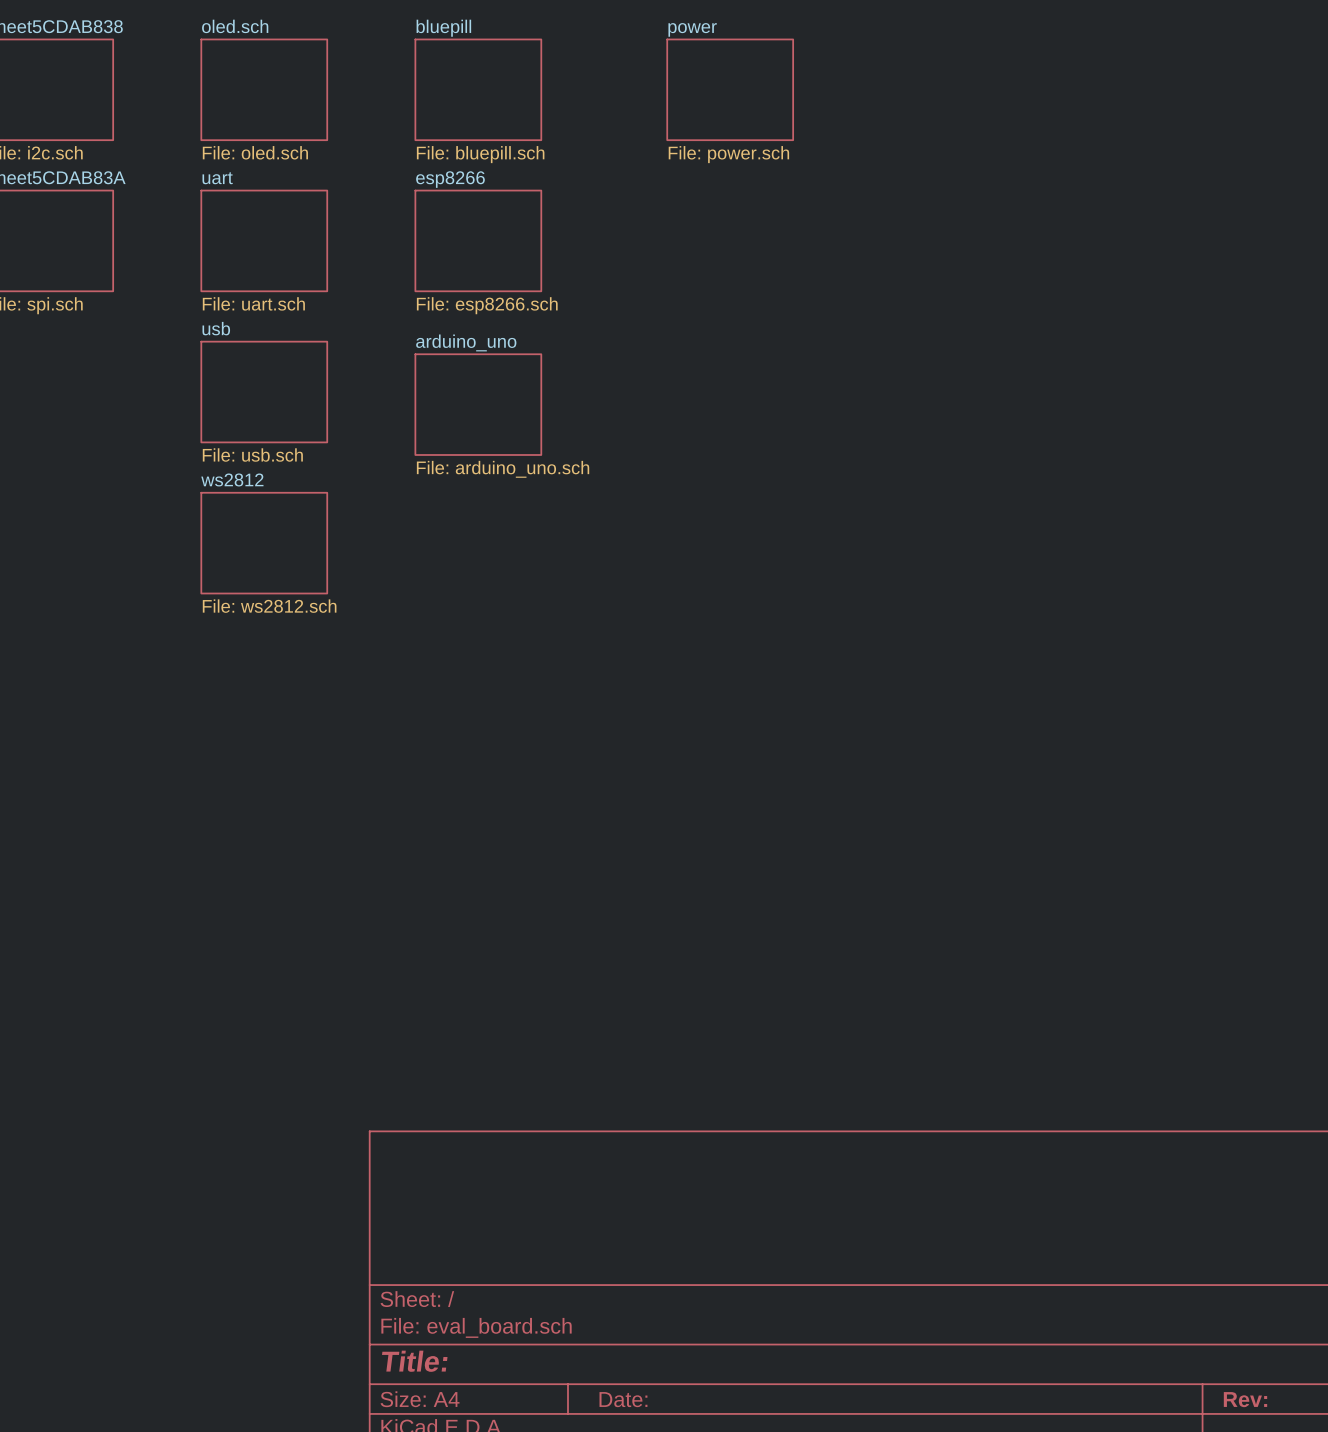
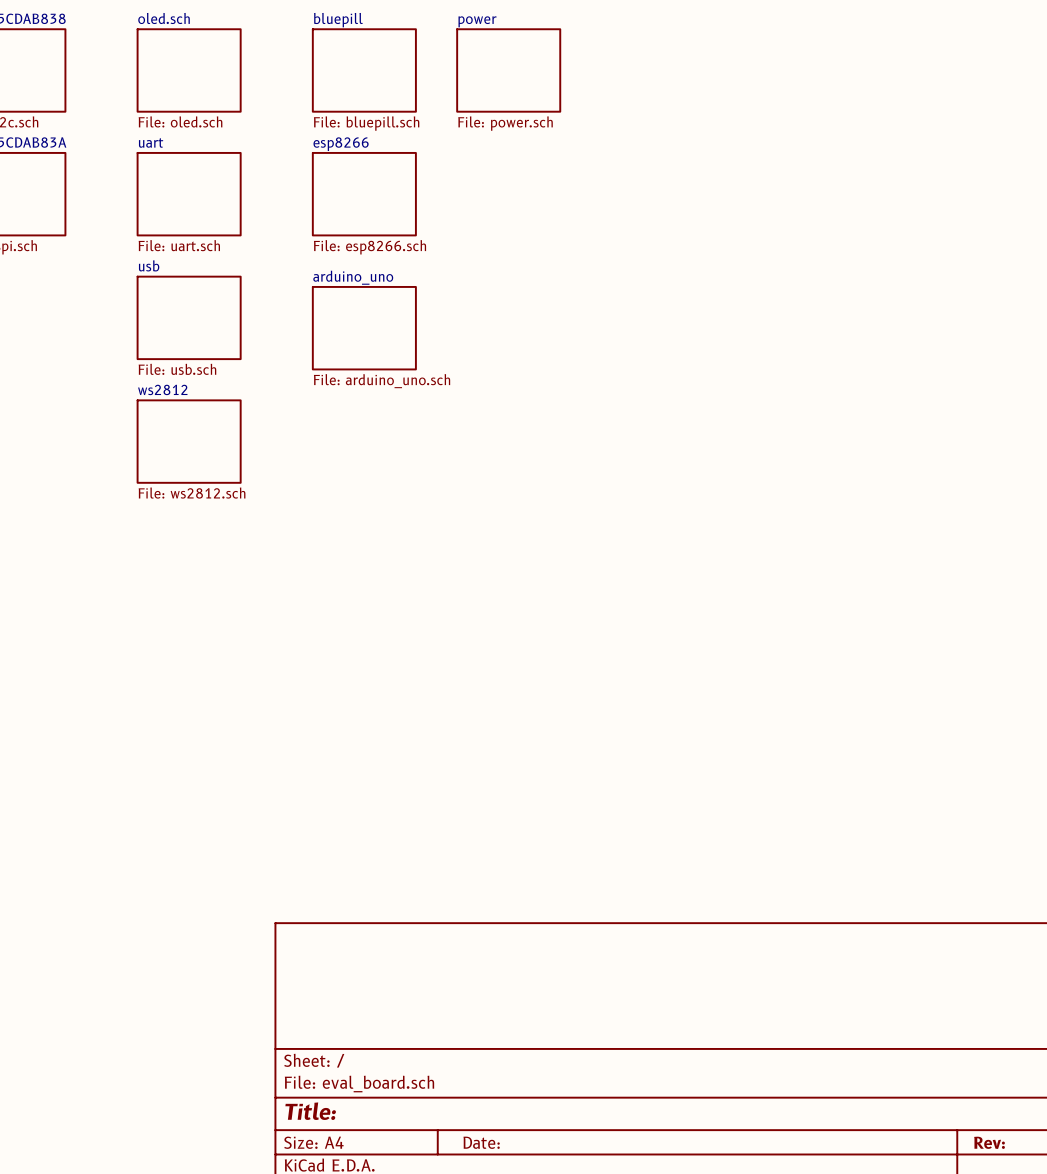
sheet power position: (730, 89) -> (508, 70)

